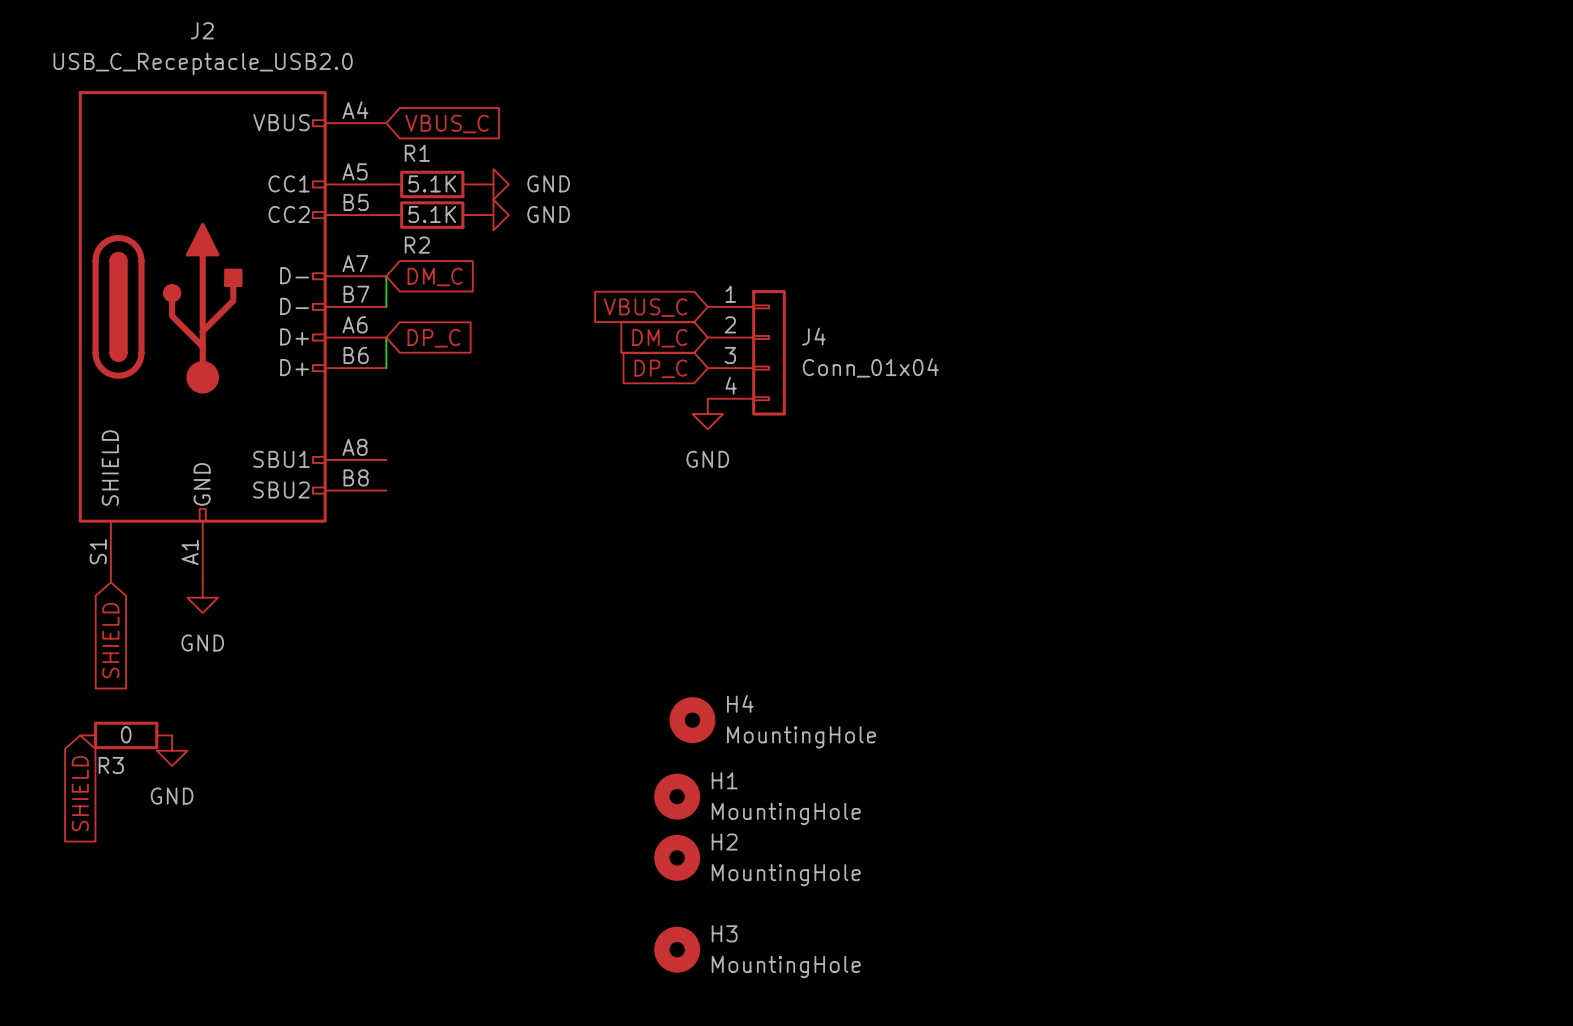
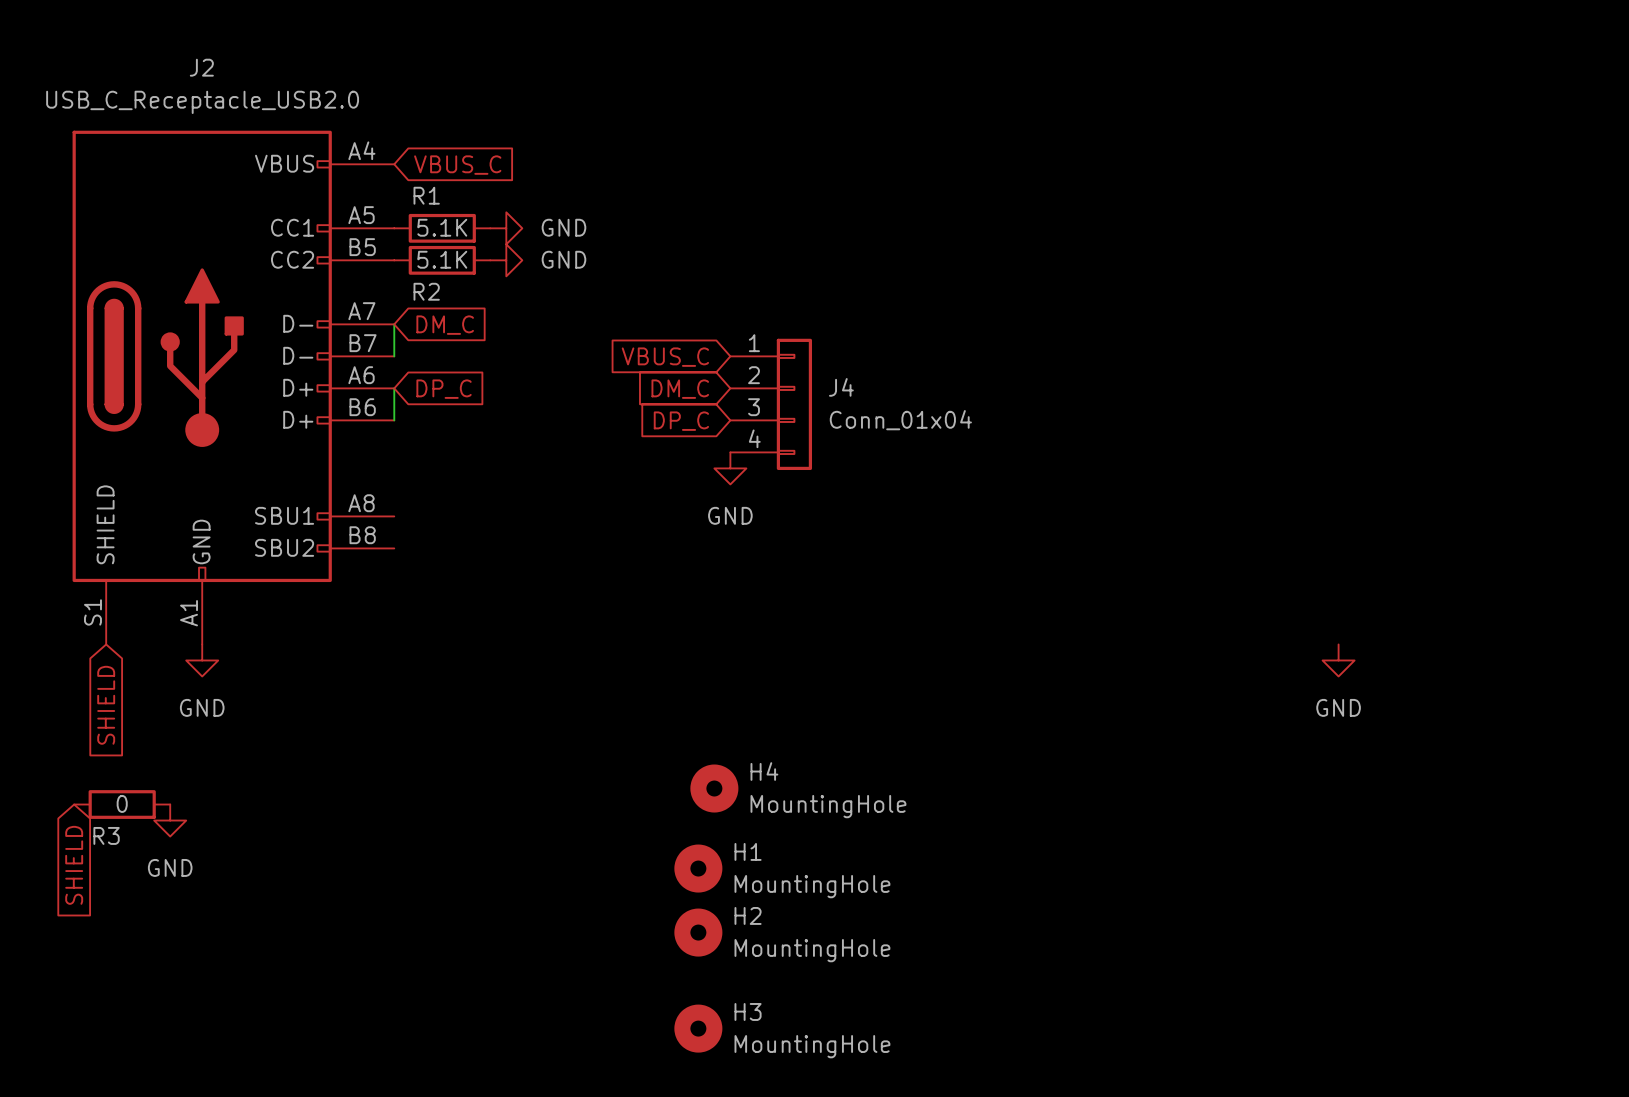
power symbol: none -> GND (1338, 660)

